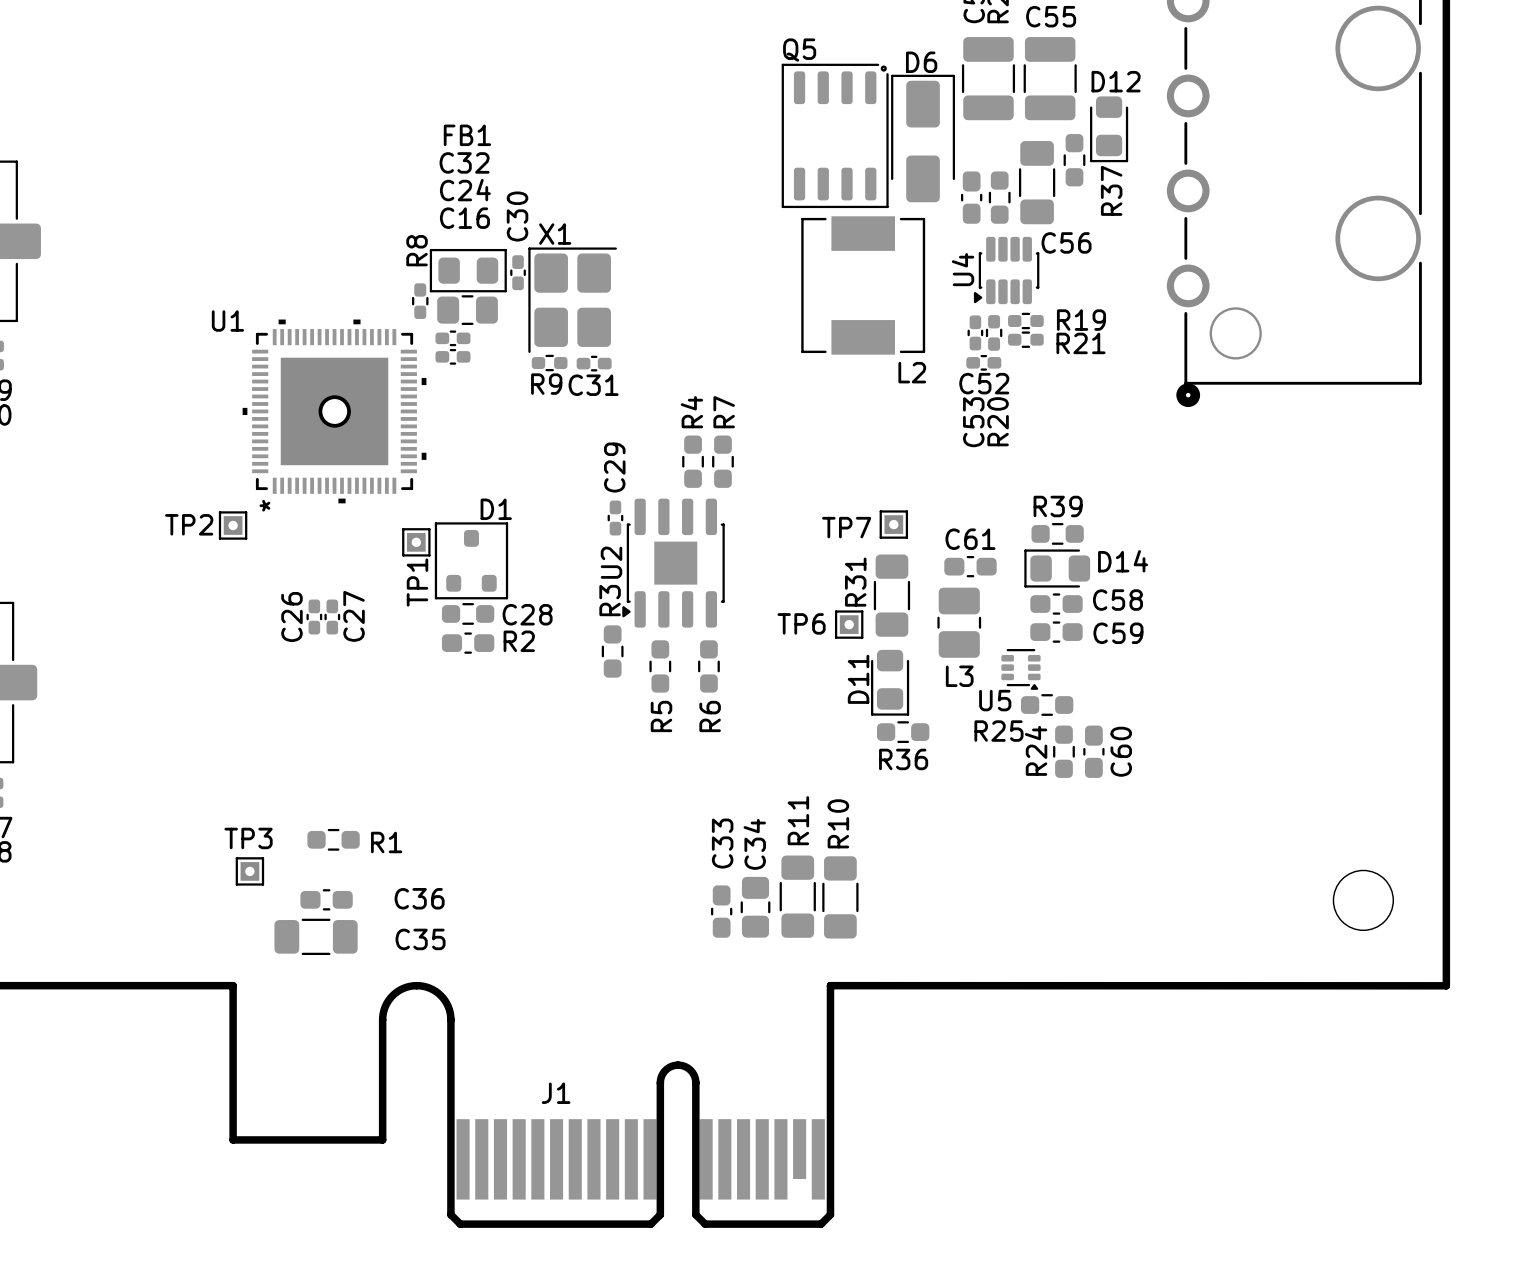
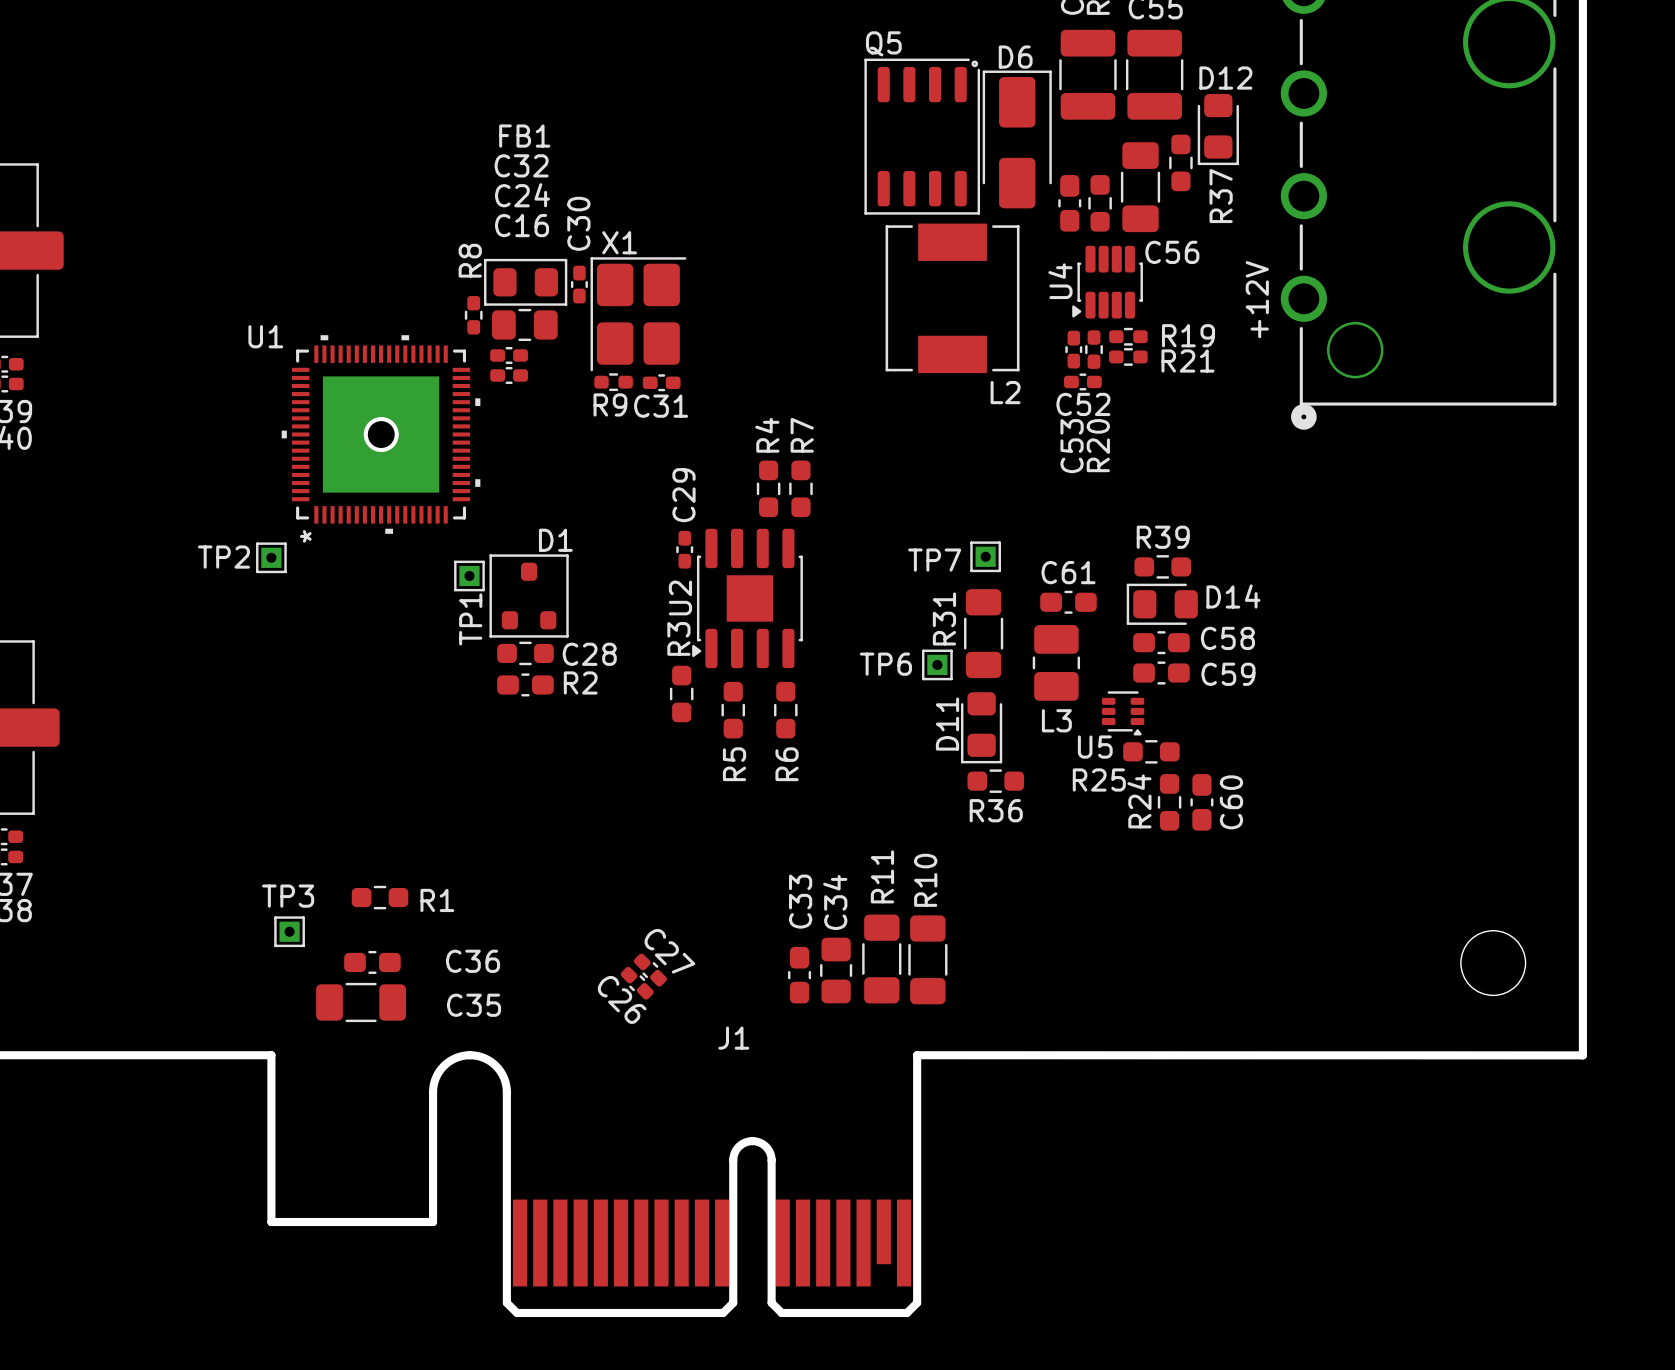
text: none -> +12V (1257, 299)
C26 rotation: 0° (314, 617) -> 45° counterclockwise (637, 983)
C26 position: (314, 617) -> (637, 983)
C27 rotation: 0° (332, 617) -> 45° counterclockwise (650, 970)
C27 position: (332, 617) -> (650, 970)
J1 name position: J1 (556, 1093) -> J1 (733, 1038)

